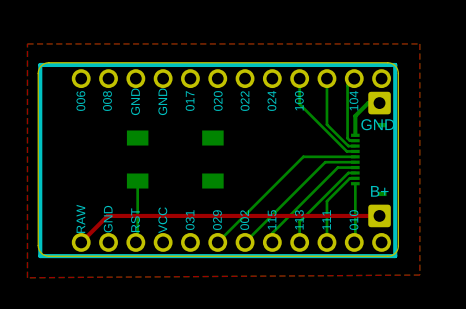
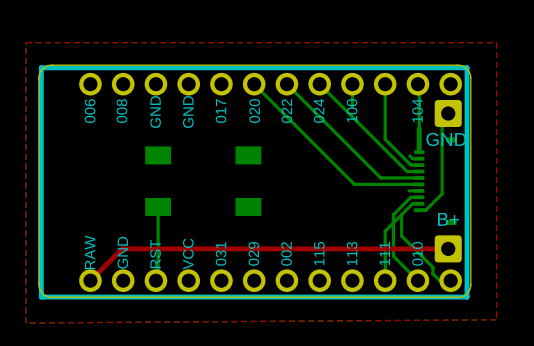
bottom track: (354, 78) (347, 85) (347, 138) -> (417, 84) (419, 128)
bottom track: (299, 97) (299, 104) (346, 151) -> (319, 84) (409, 171)
bottom track: (379, 103) (368, 103) (355, 115) -> none
bottom track: none -> (448, 116) (442, 122) (442, 193) (425, 210) (419, 210)
bottom track: (323, 156) (303, 156) (217, 242) -> (380, 177) (286, 84)
bottom track: (325, 162) (245, 242) -> (383, 184) (354, 184) (254, 84)
bottom track: (346, 167) (337, 167) (272, 233) (272, 242) -> none
bottom track: (355, 183) (354, 242) -> (393, 214) (393, 256) (417, 280)
bottom track: (333, 187) (299, 221) (299, 242) -> none
bottom track: none -> (401, 214) (401, 236) (432, 267) (432, 273) (439, 280) (450, 280)

